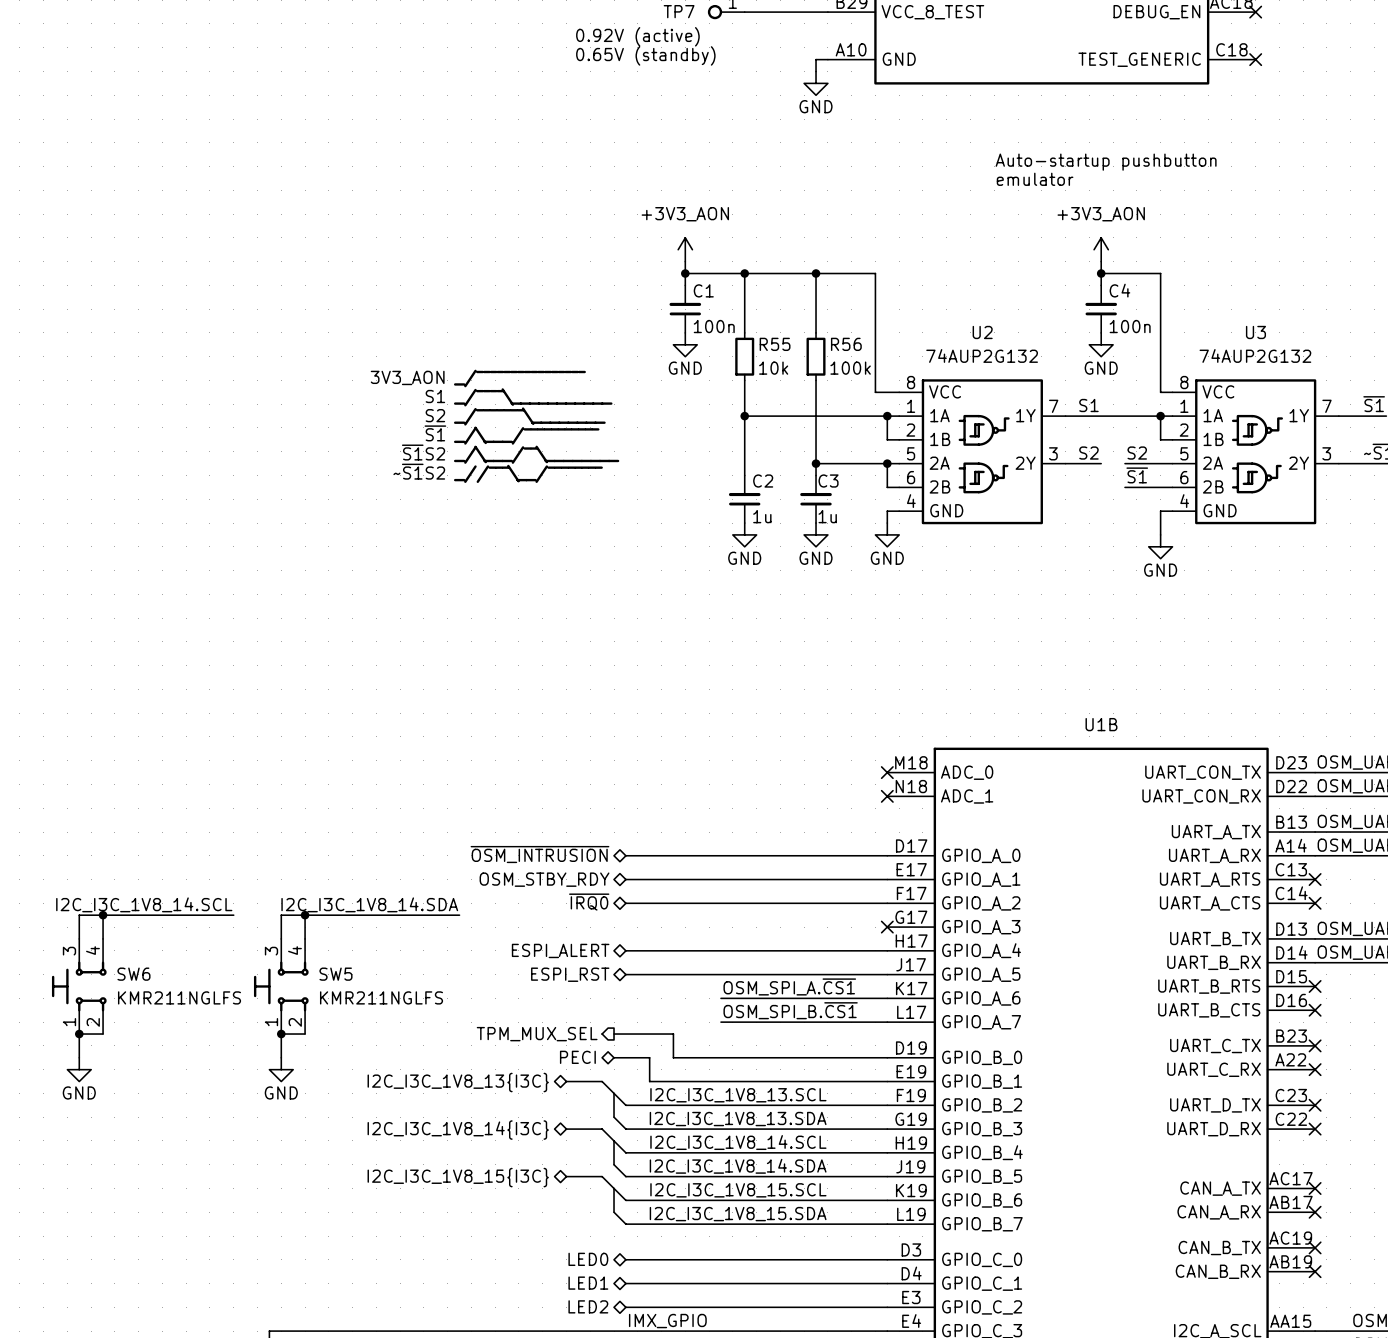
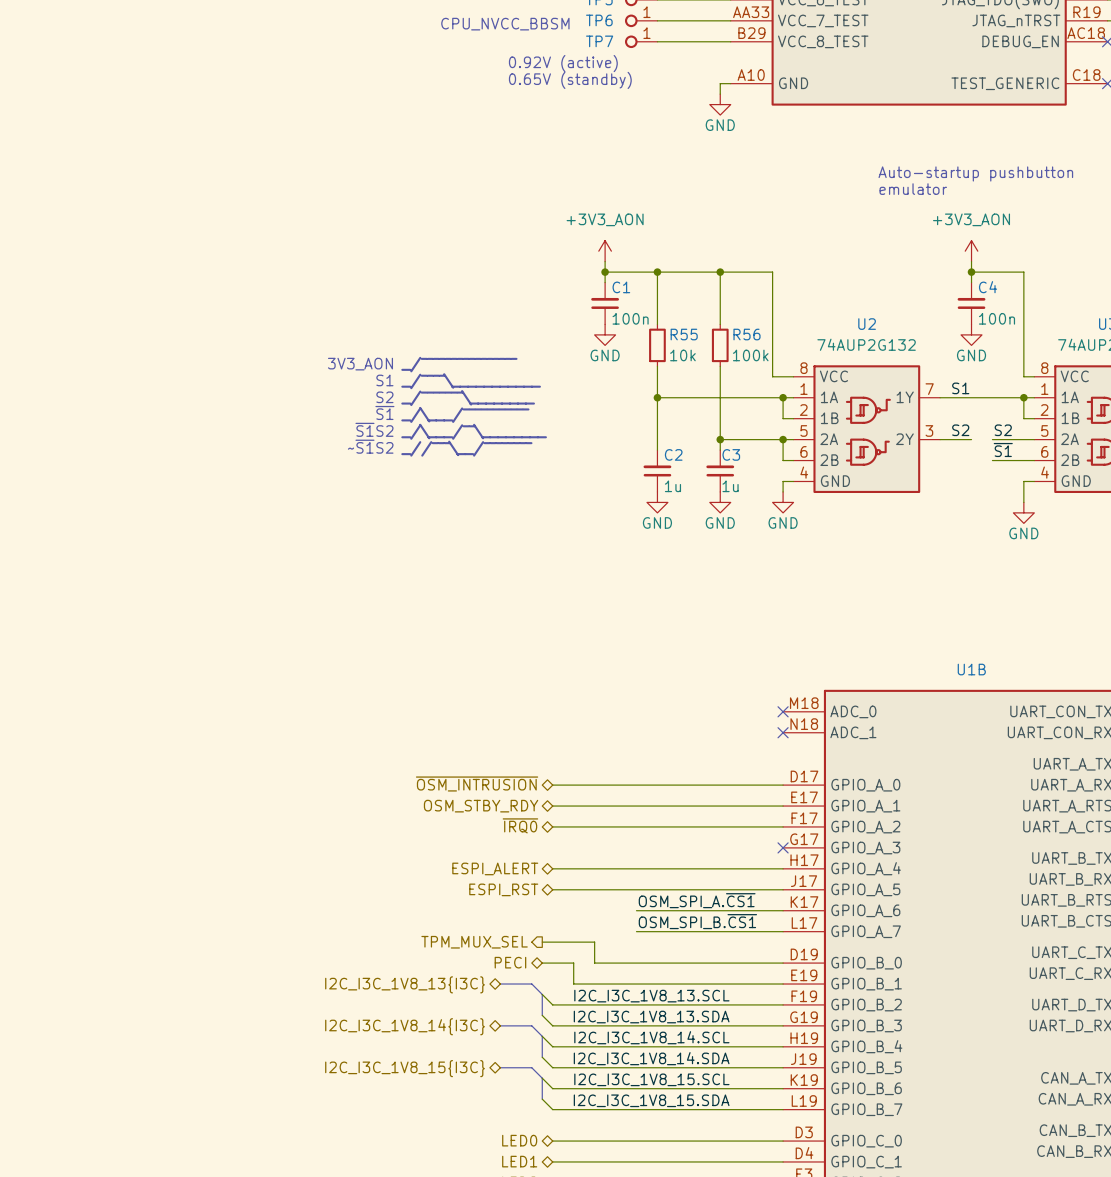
label: I2C_I3C_1V8_14.SCL (144, 904) -> none
label: I2C_I3C_1V8_14.SDA (369, 904) -> none
wire: (103, 915) (103, 938) -> none
junction: (103, 915) -> none
wire: (233, 915) (79, 915) (79, 938) -> none
wire: (305, 915) (305, 938) -> none
junction: (305, 915) -> none
wire: (459, 915) (281, 915) (281, 938) -> none
SW6: (79, 986) -> none
SW5: (281, 986) -> none
junction: (79, 1034) -> none
wire: (103, 1034) (79, 1034) (79, 1057) -> none
junction: (281, 1034) -> none
wire: (305, 1034) (281, 1034) (281, 1057) -> none
power symbol: GND (79, 1069) -> none
power symbol: GND (281, 1069) -> none

